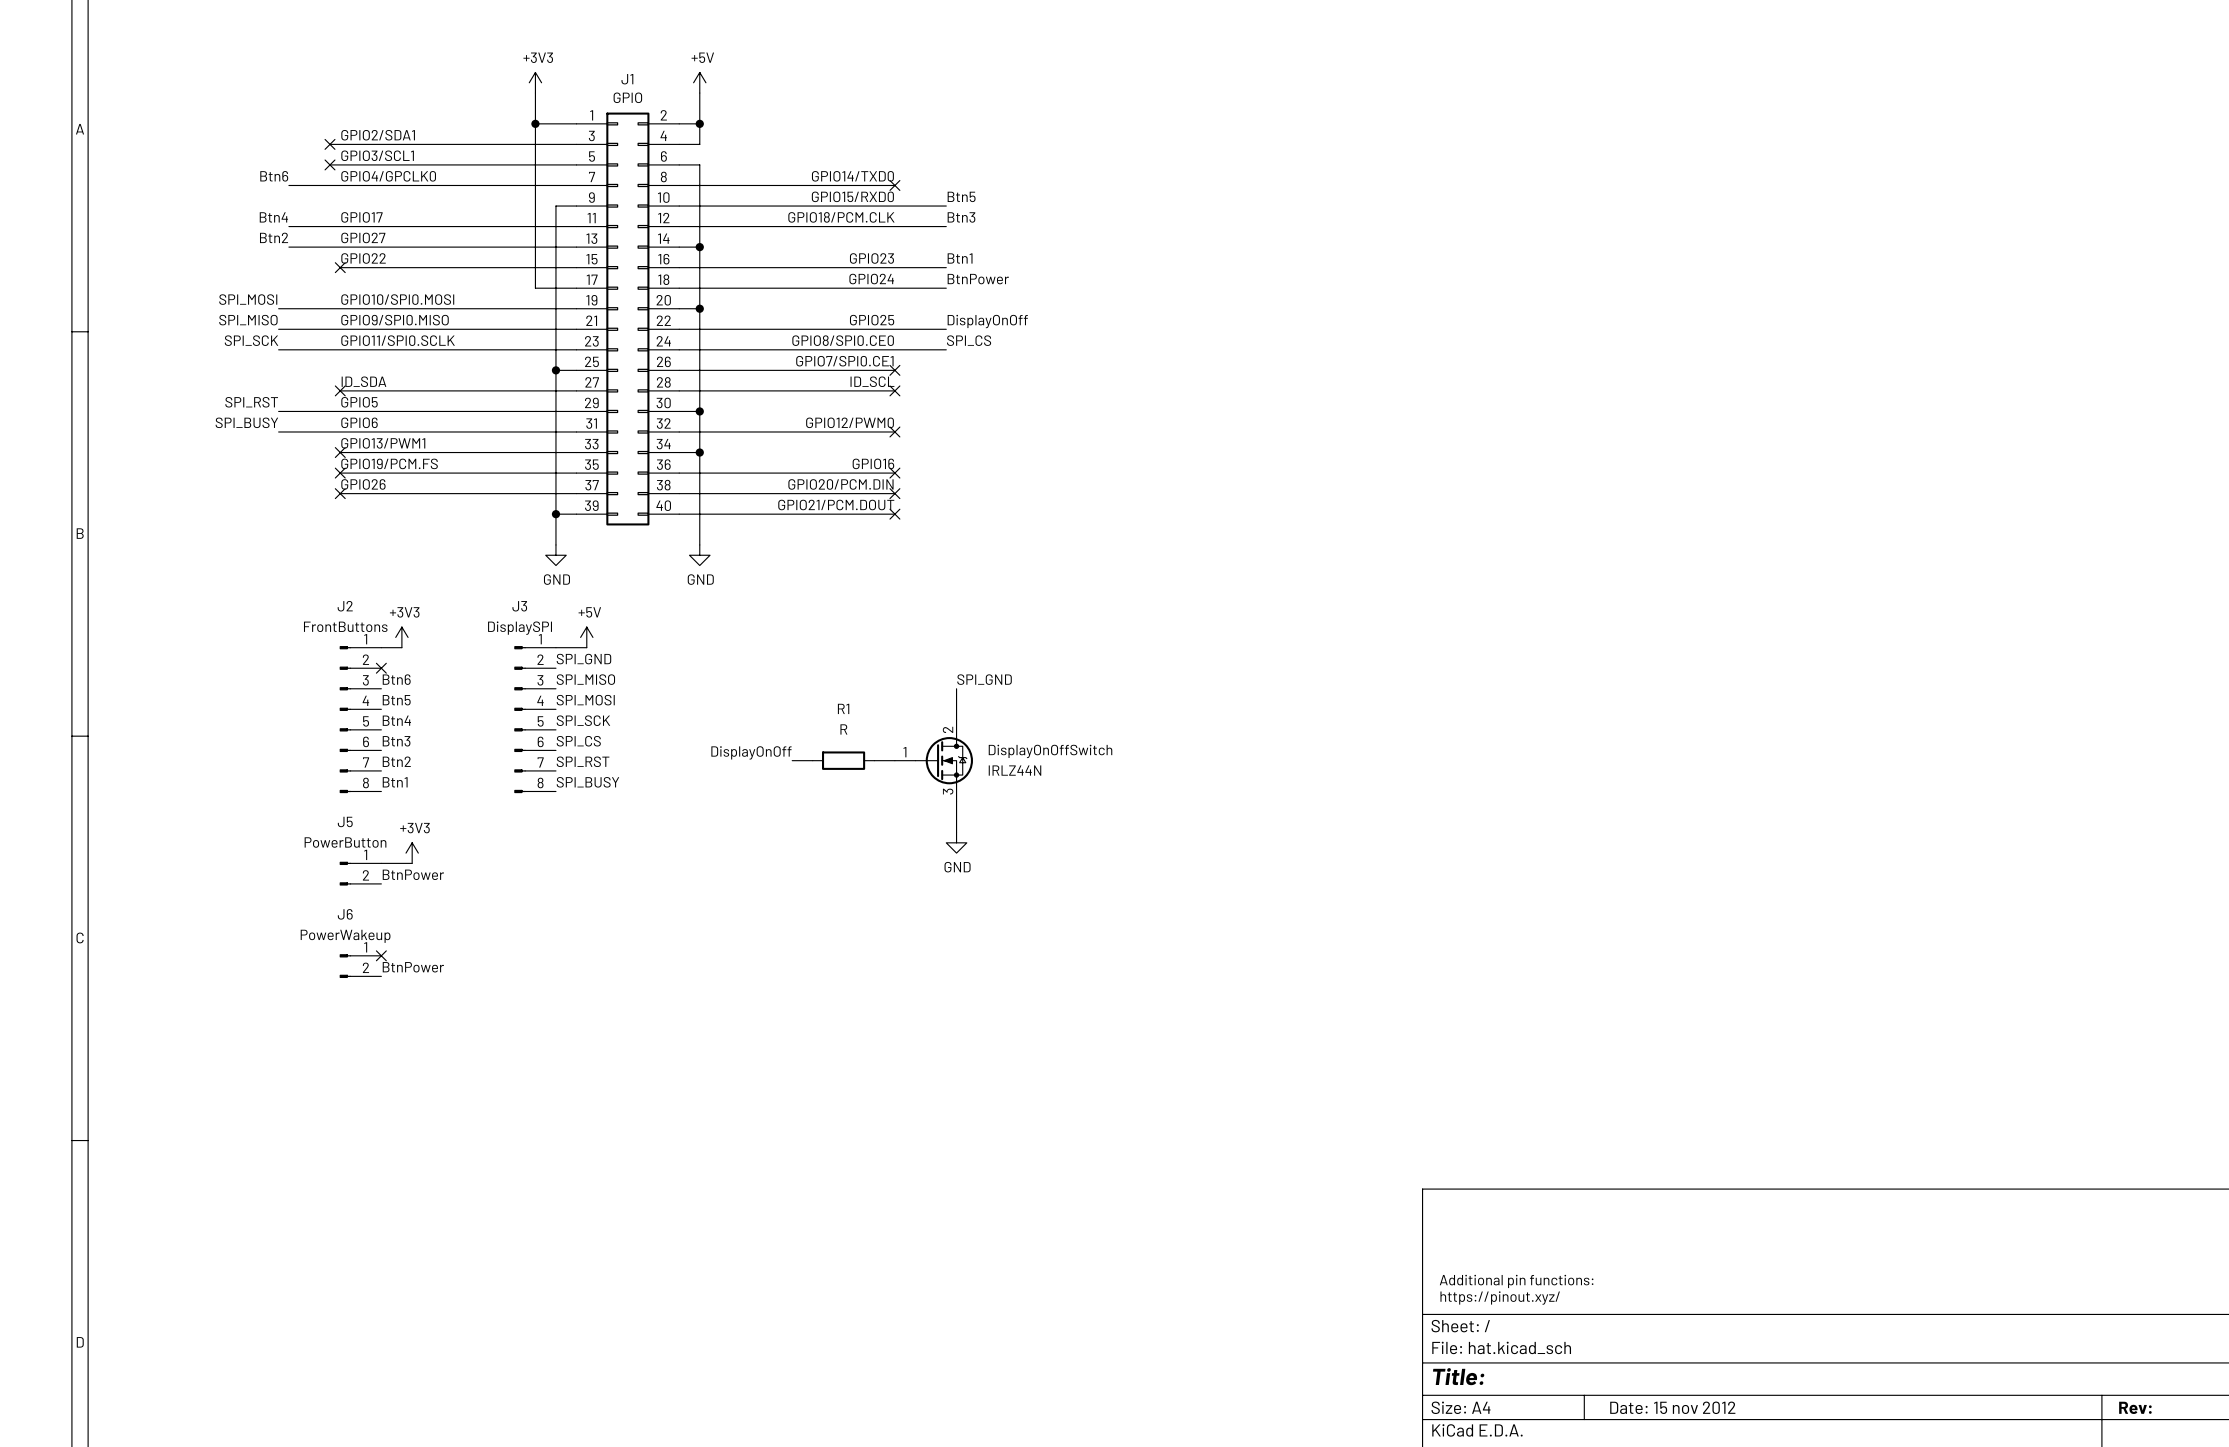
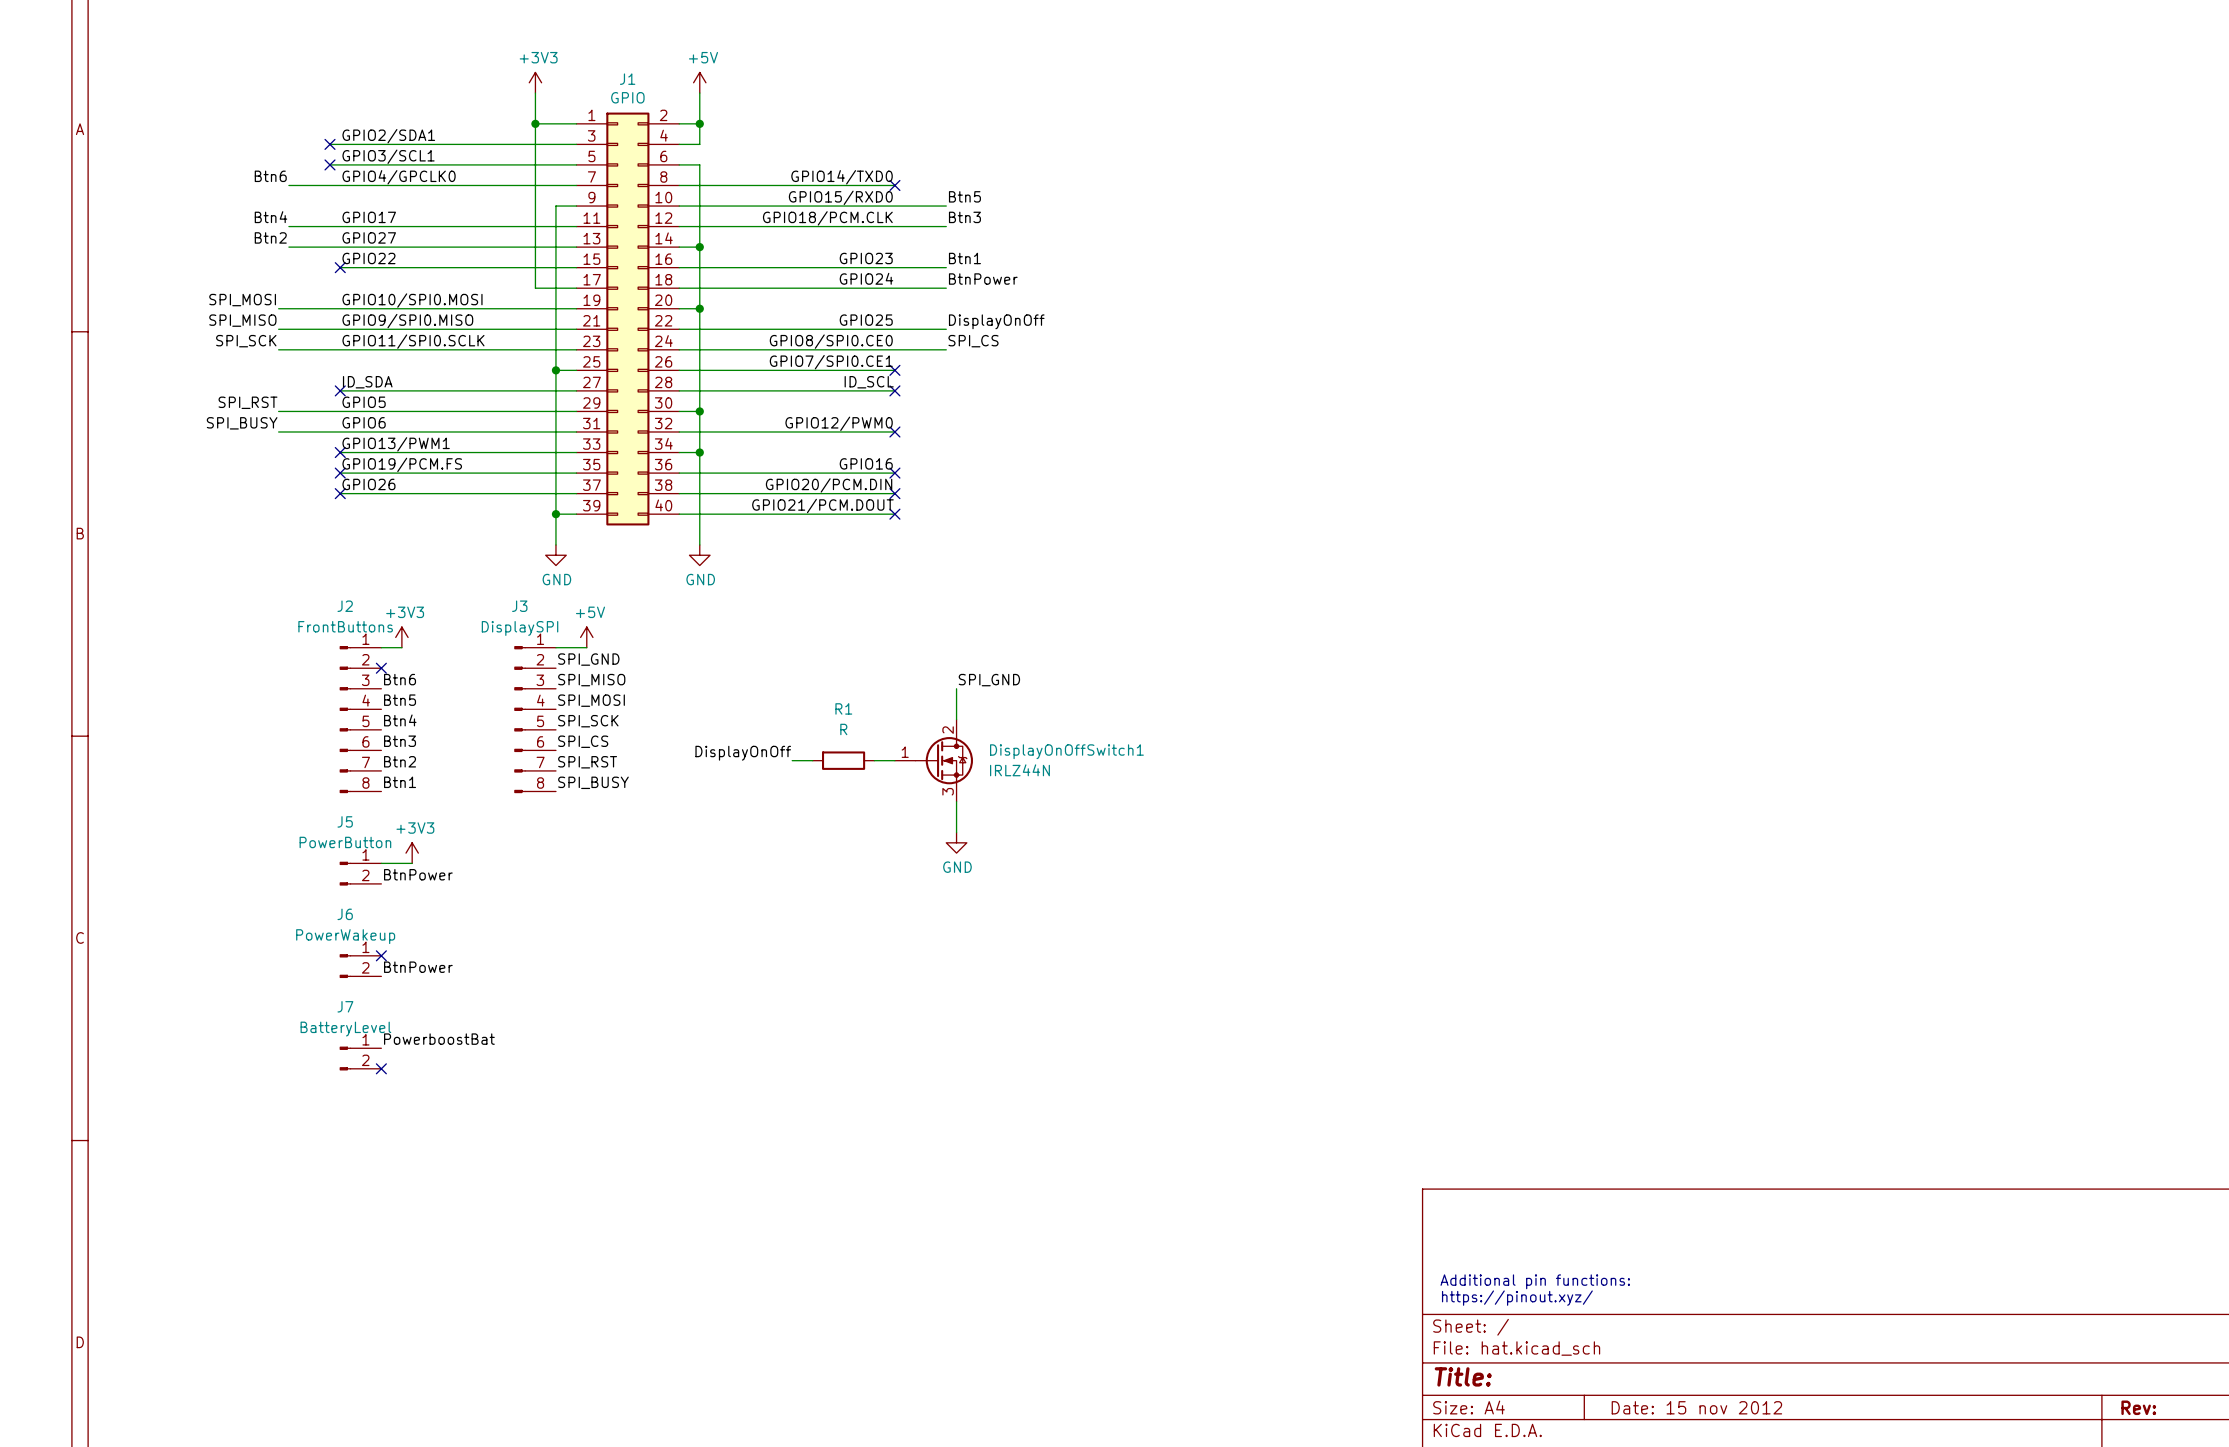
DisplayOnOffSwitch name: DisplayOnOffSwitch (1050, 751) -> DisplayOnOffSwitch1 (1066, 751)
label: none -> PowerboostBat (439, 1039)
J7: none -> BatteryLevel (360, 1058)
no-connect mark: none -> (381, 1068)

